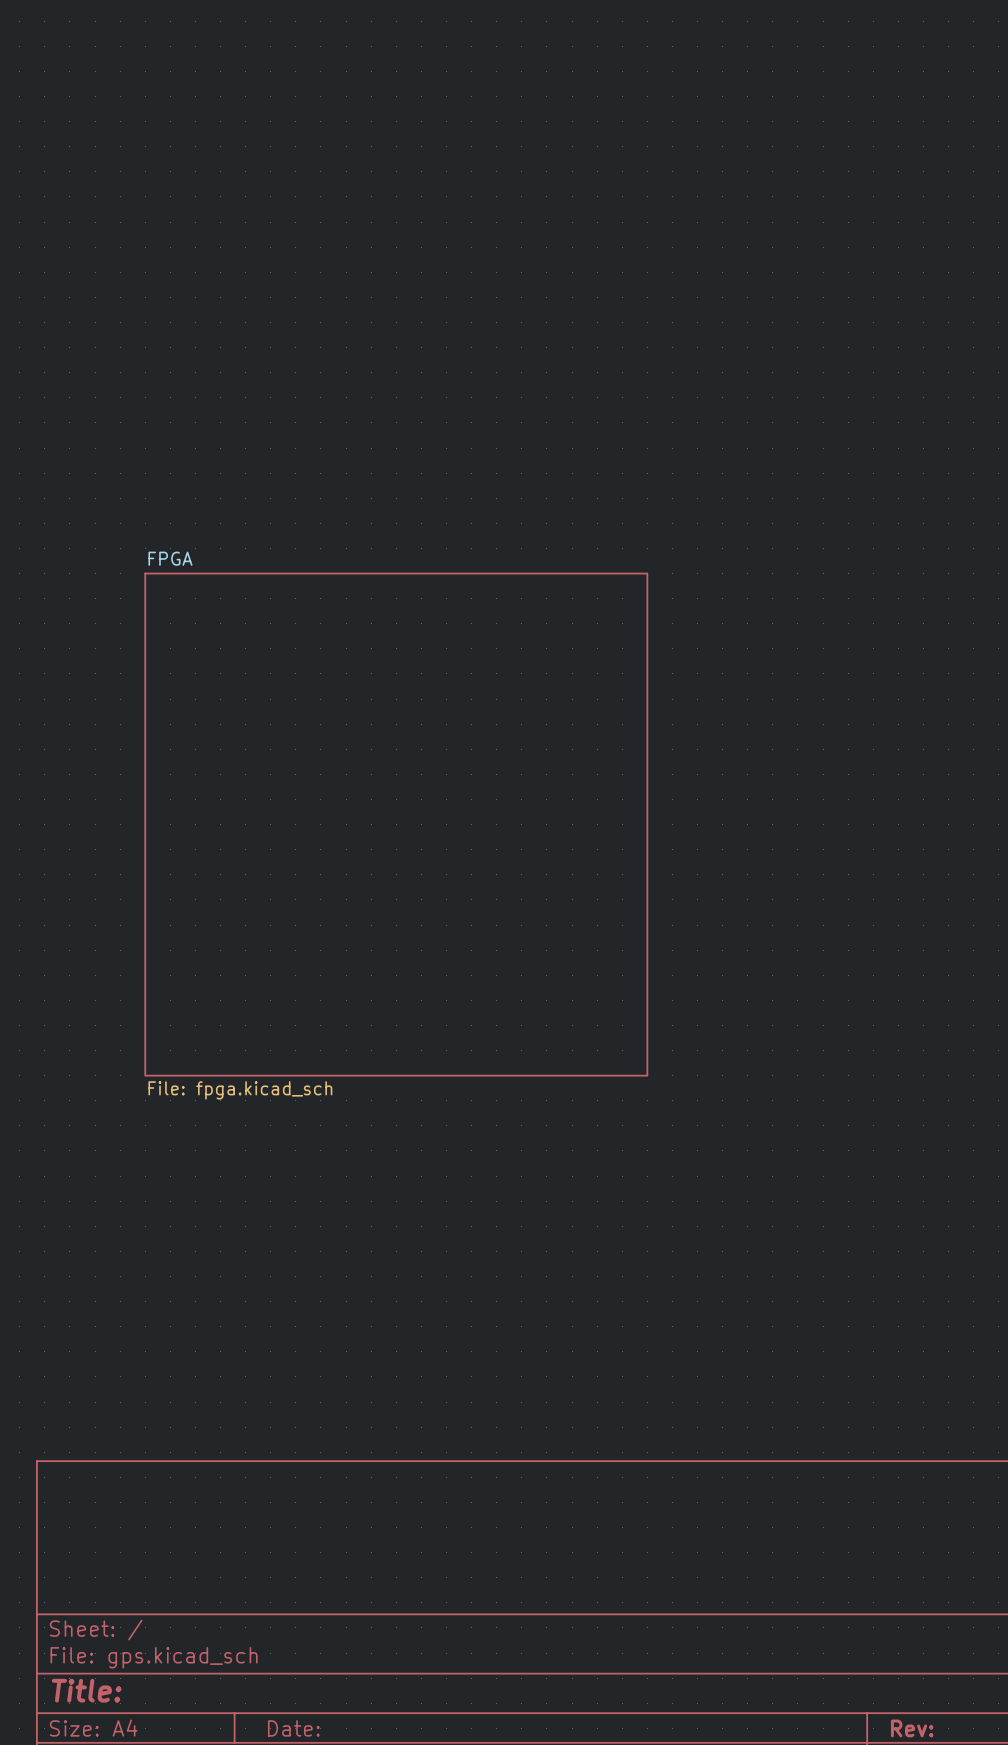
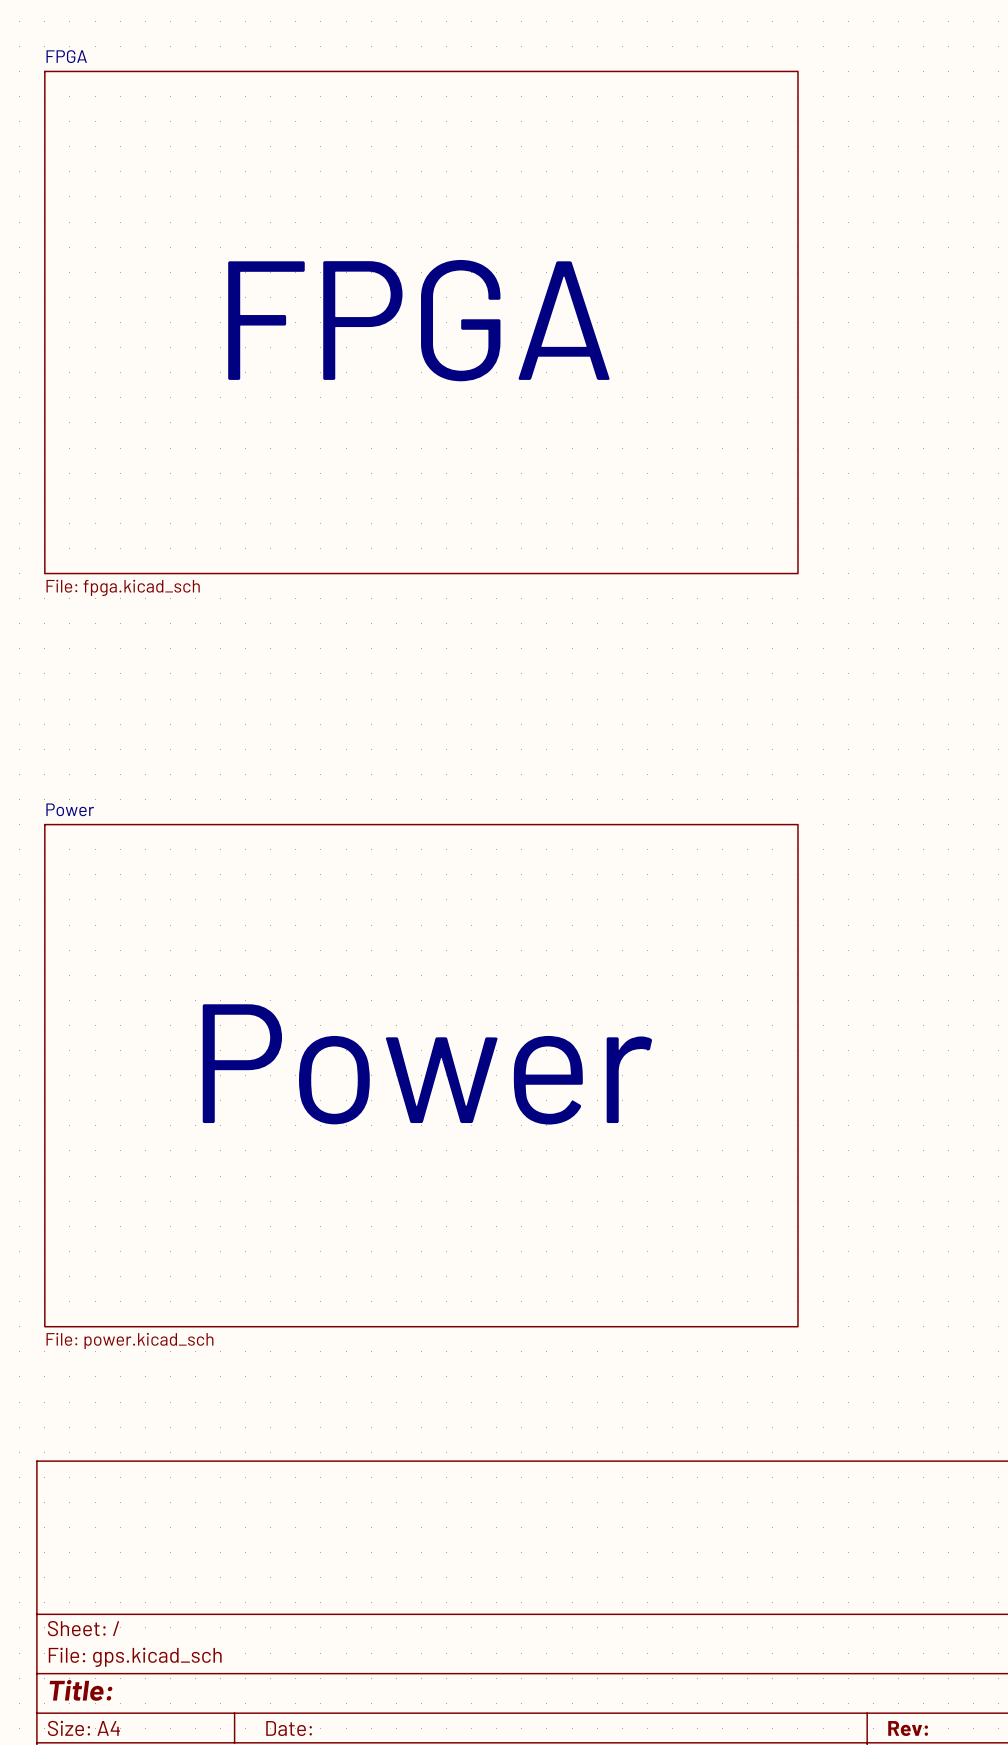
text: none -> FPGA (418, 320)
sheet FPGA: none -> File: fpga.kicad_sch (421, 322)
sheet FPGA: File: fpga.kicad_sch (396, 824) -> none
text: none -> Power (427, 1064)
sheet Power: none -> File: power.kicad_sch (421, 1075)

